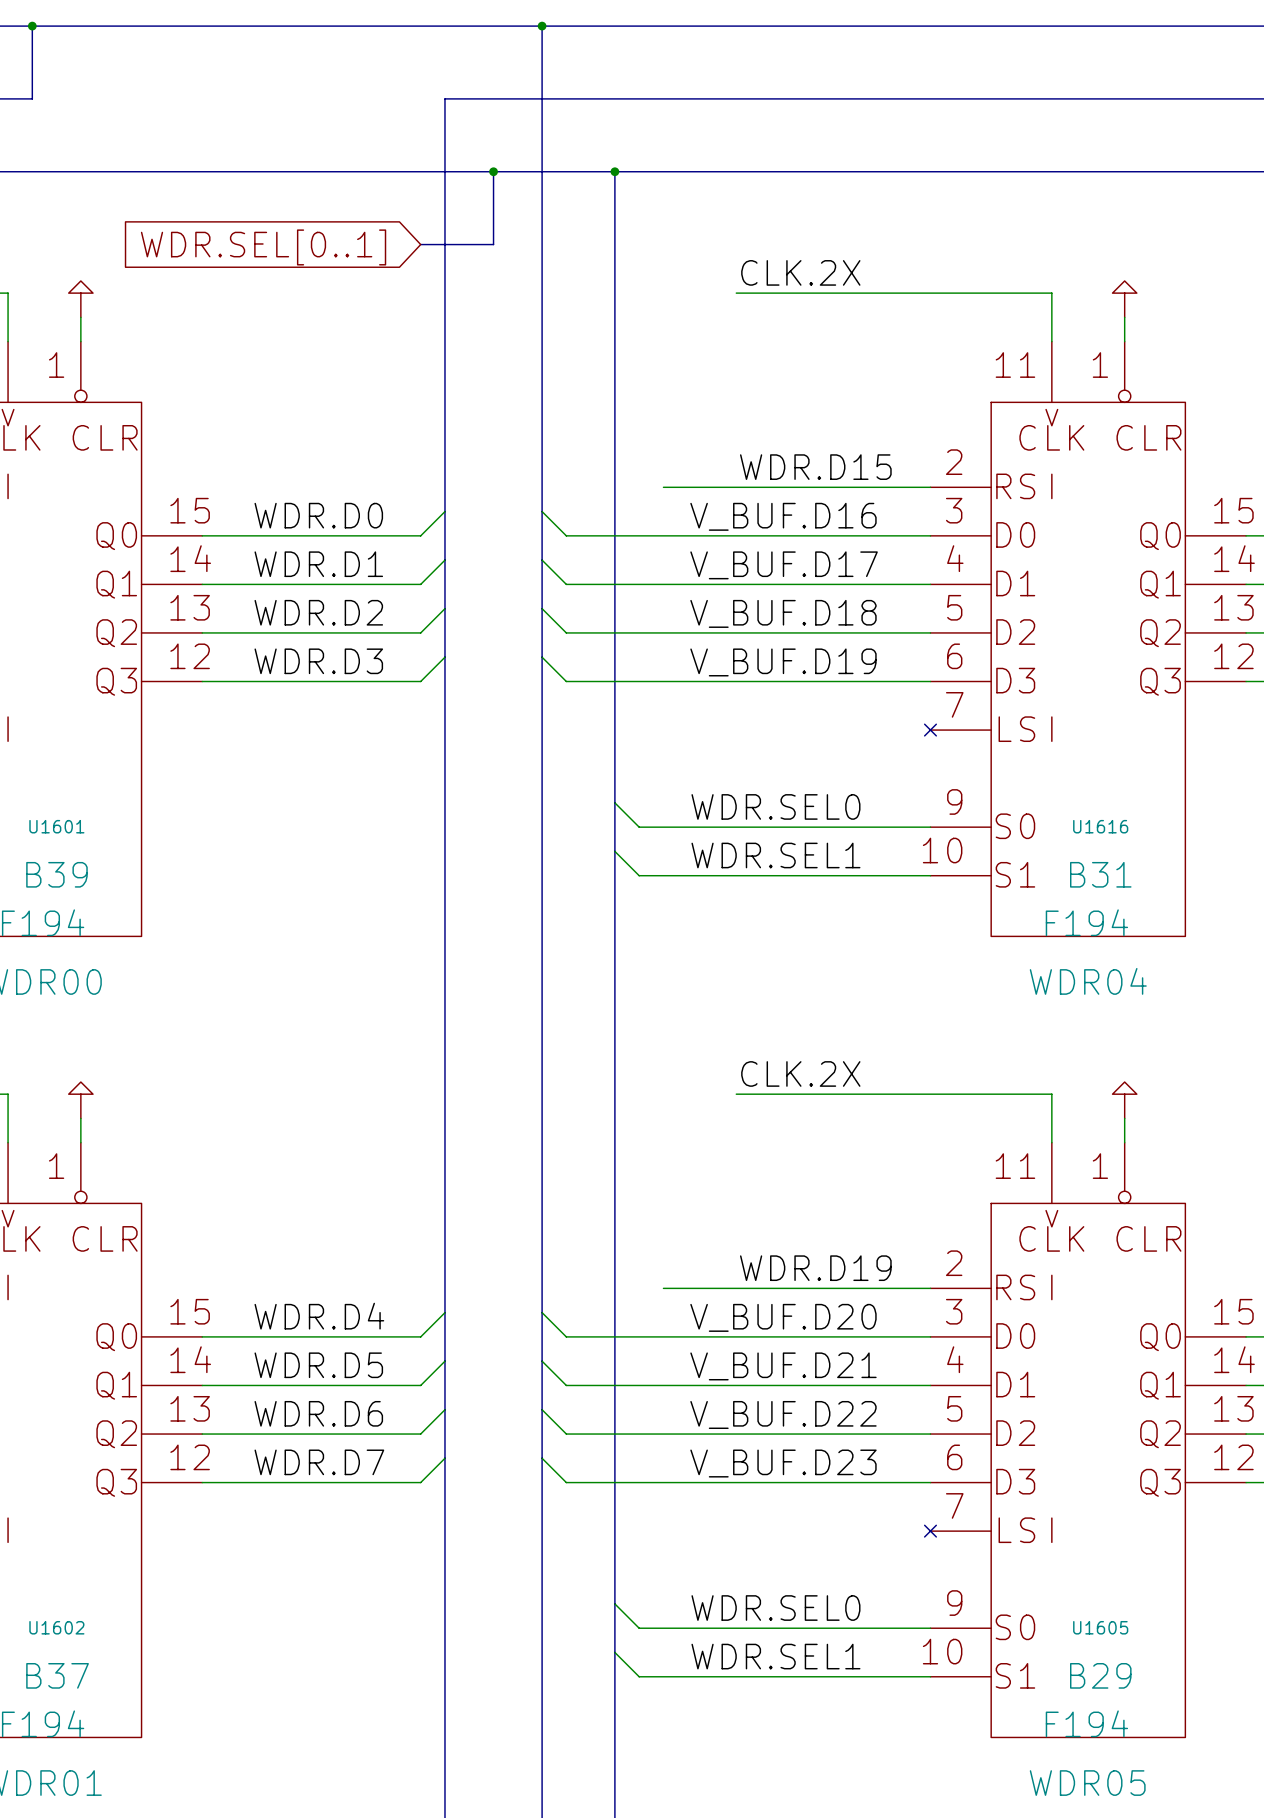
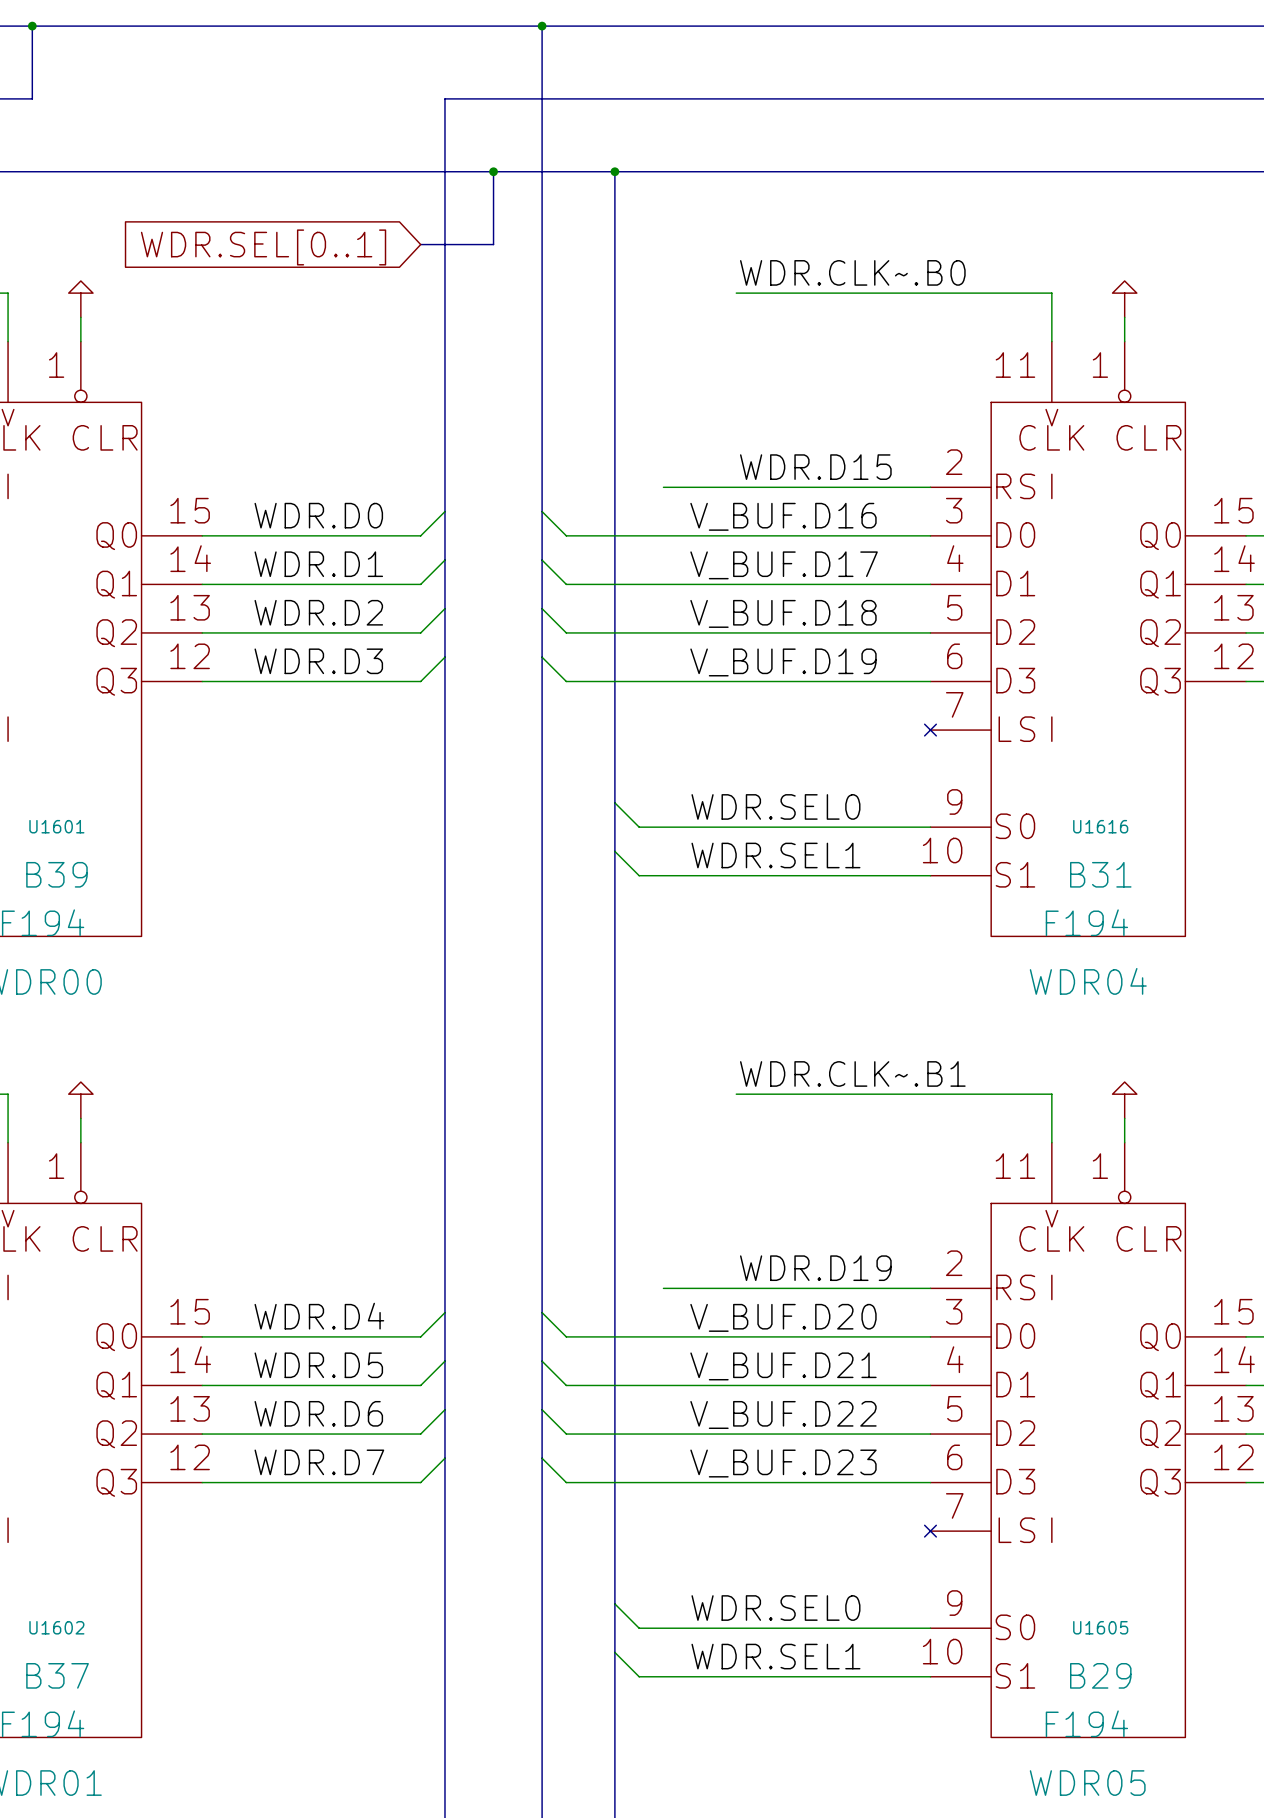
label: CLK.2X (800, 272) -> WDR.CLK~.B0 (852, 272)
label: CLK.2X (800, 1073) -> WDR.CLK~.B1 (852, 1073)

